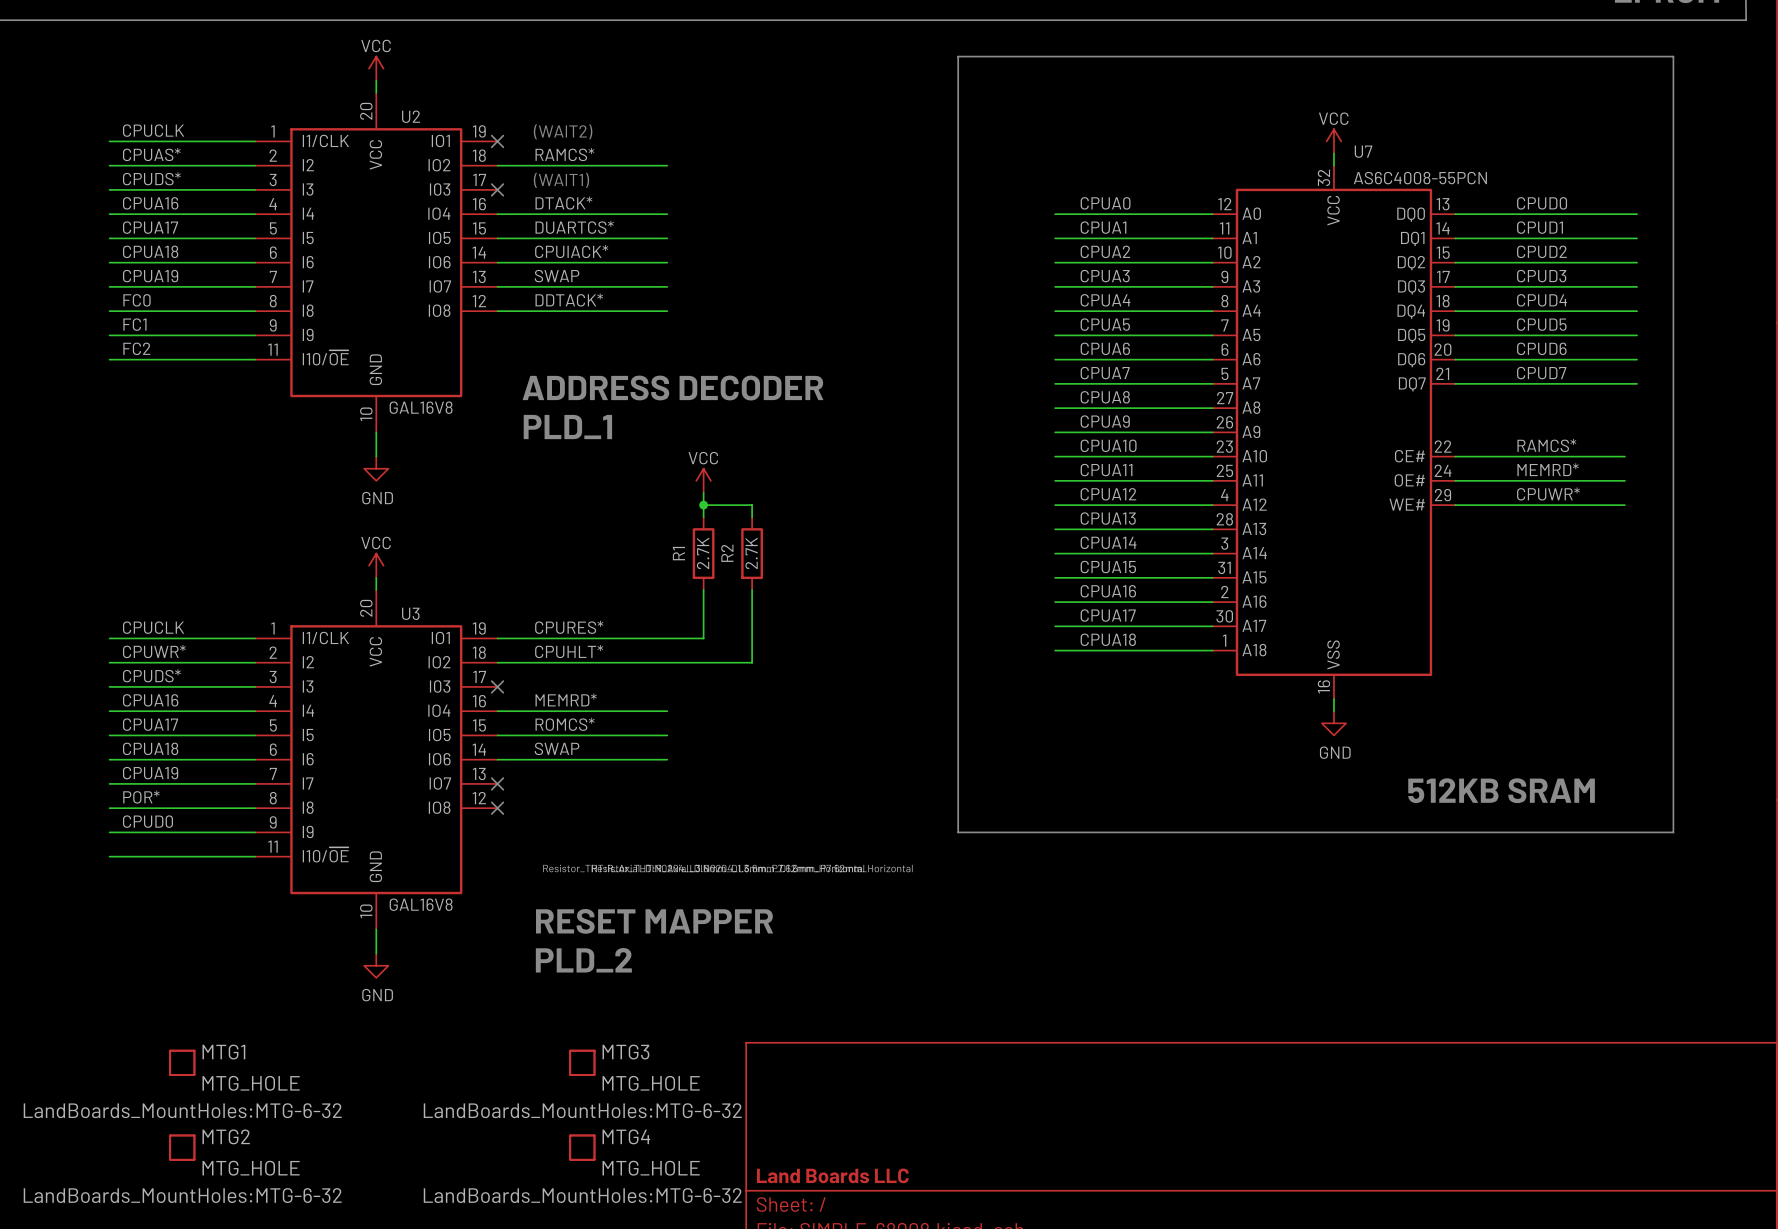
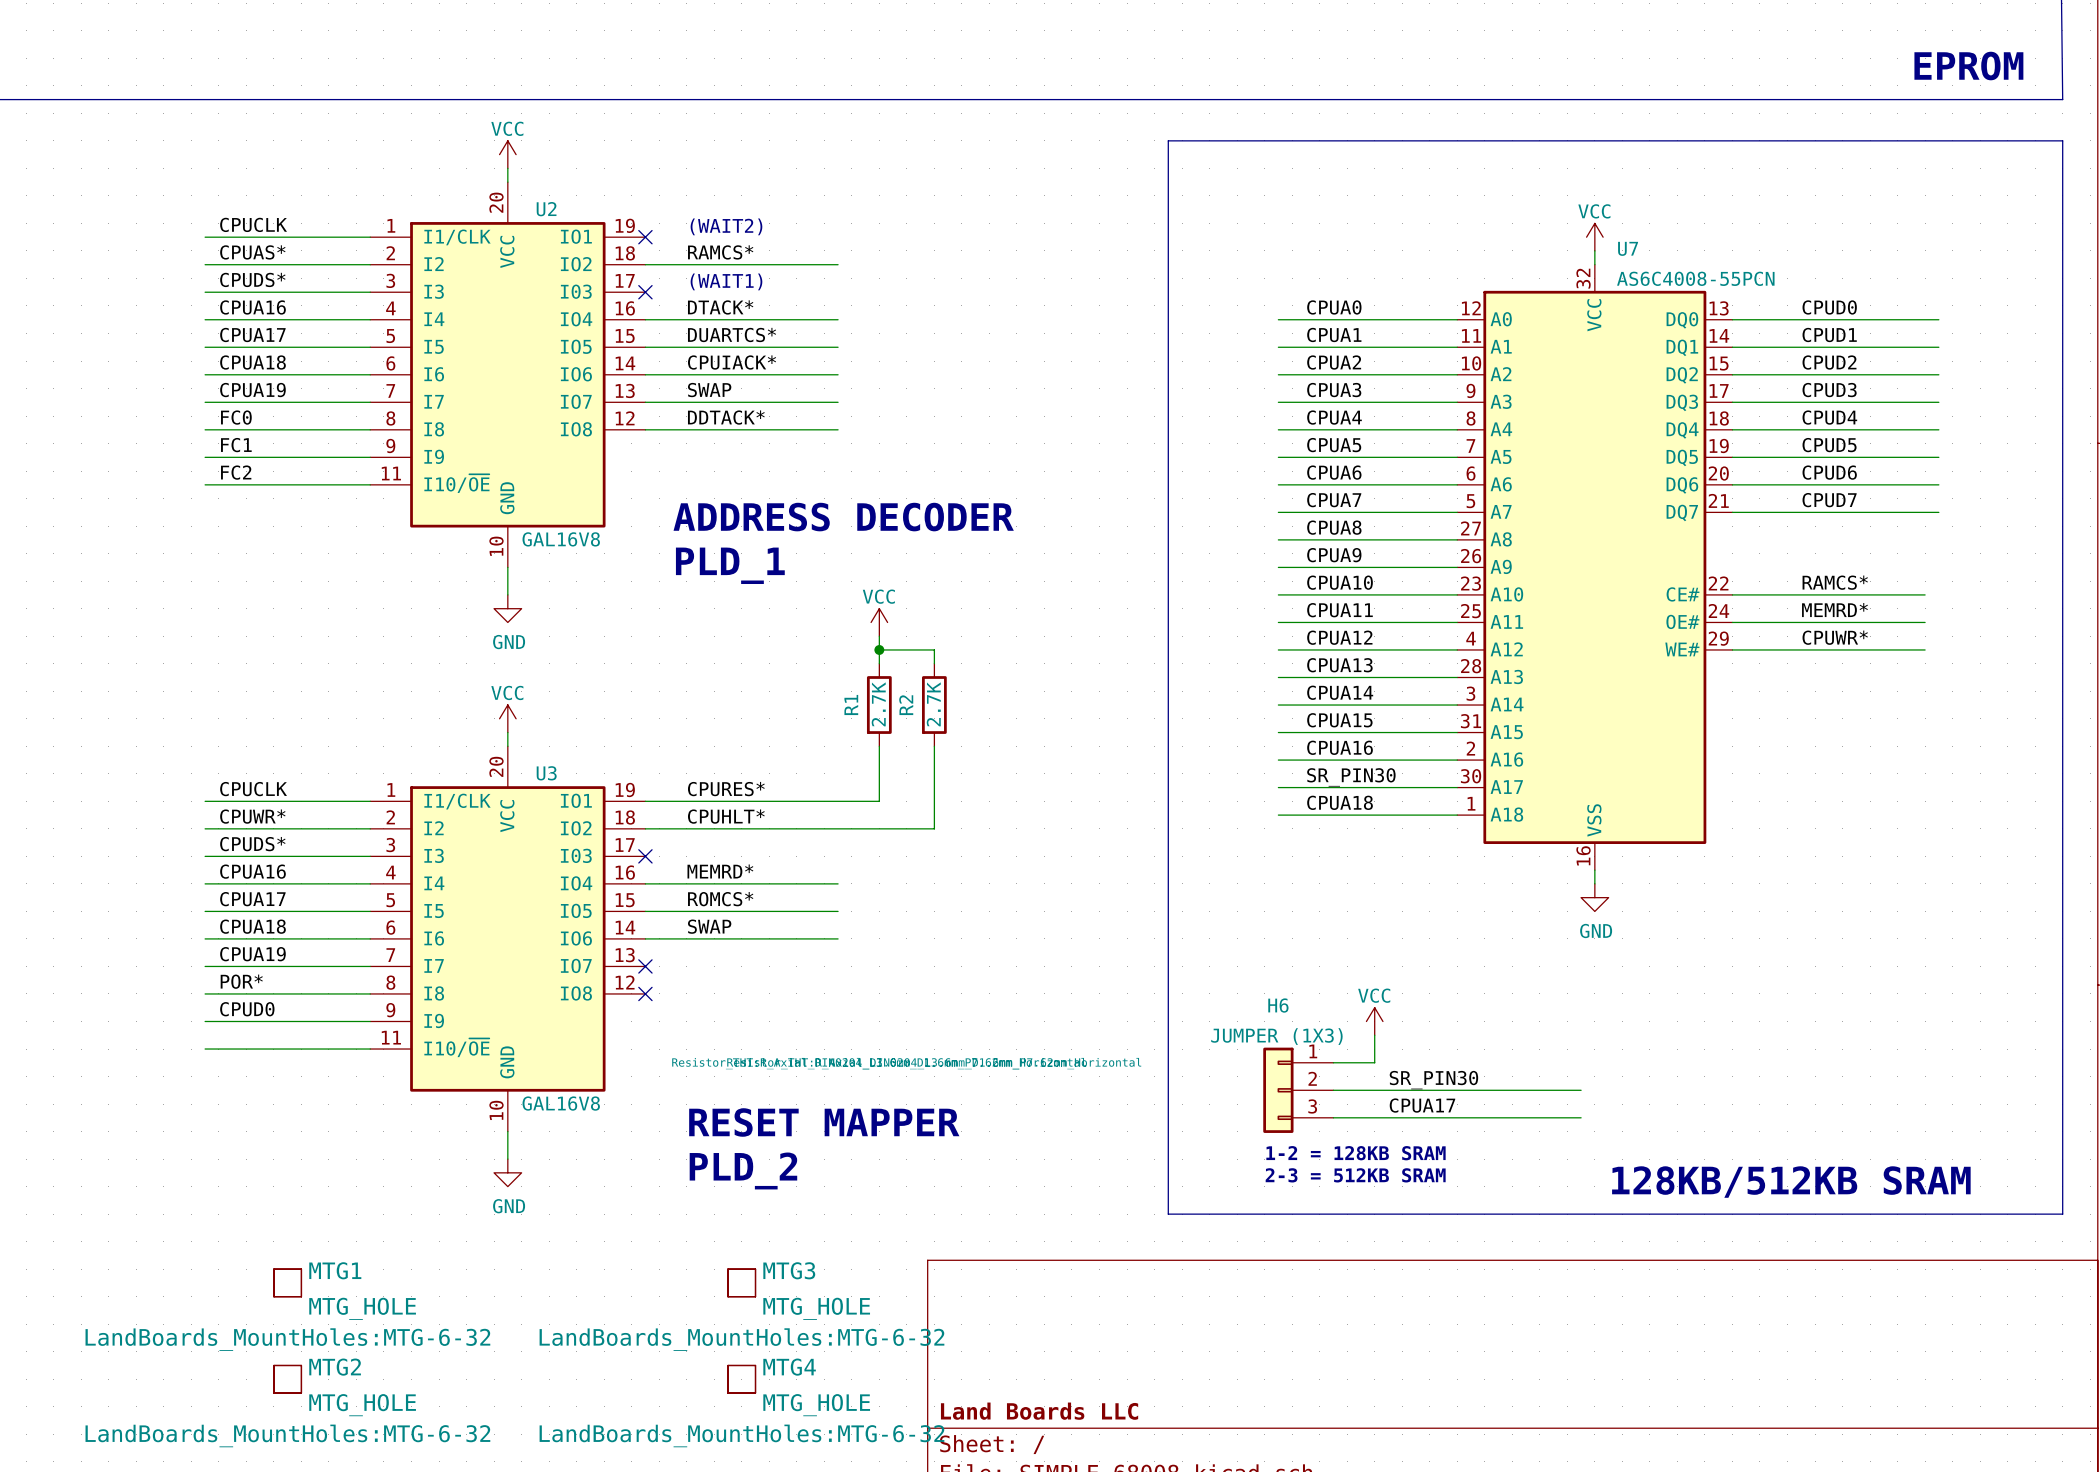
line: (1673, 56) (1673, 832) (958, 832) -> (1980, 140) (2062, 140) (2062, 1214) (1168, 1214) (1168, 1021)
label: CPUA17 (1108, 615) -> SR_PIN30 (1351, 777)
text: 512KB SRAM (1501, 790) -> none
power symbol: none -> VCC (1374, 1021)
wire: none -> (1374, 1035) (1374, 1062) (1333, 1062)
label: none -> SR_PIN30 (1433, 1080)
H6: none -> JUMPER (1X3) (1298, 1090)
wire: none -> (1333, 1090) (1581, 1090)
label: none -> CPUA17 (1422, 1105)
wire: none -> (1333, 1117) (1581, 1117)
text: none -> 1-2 = 128KB SRAM (1355, 1153)
text: none -> 2-3 = 512KB SRAM (1355, 1175)
text: none -> 128KB/512KB SRAM (1791, 1182)

